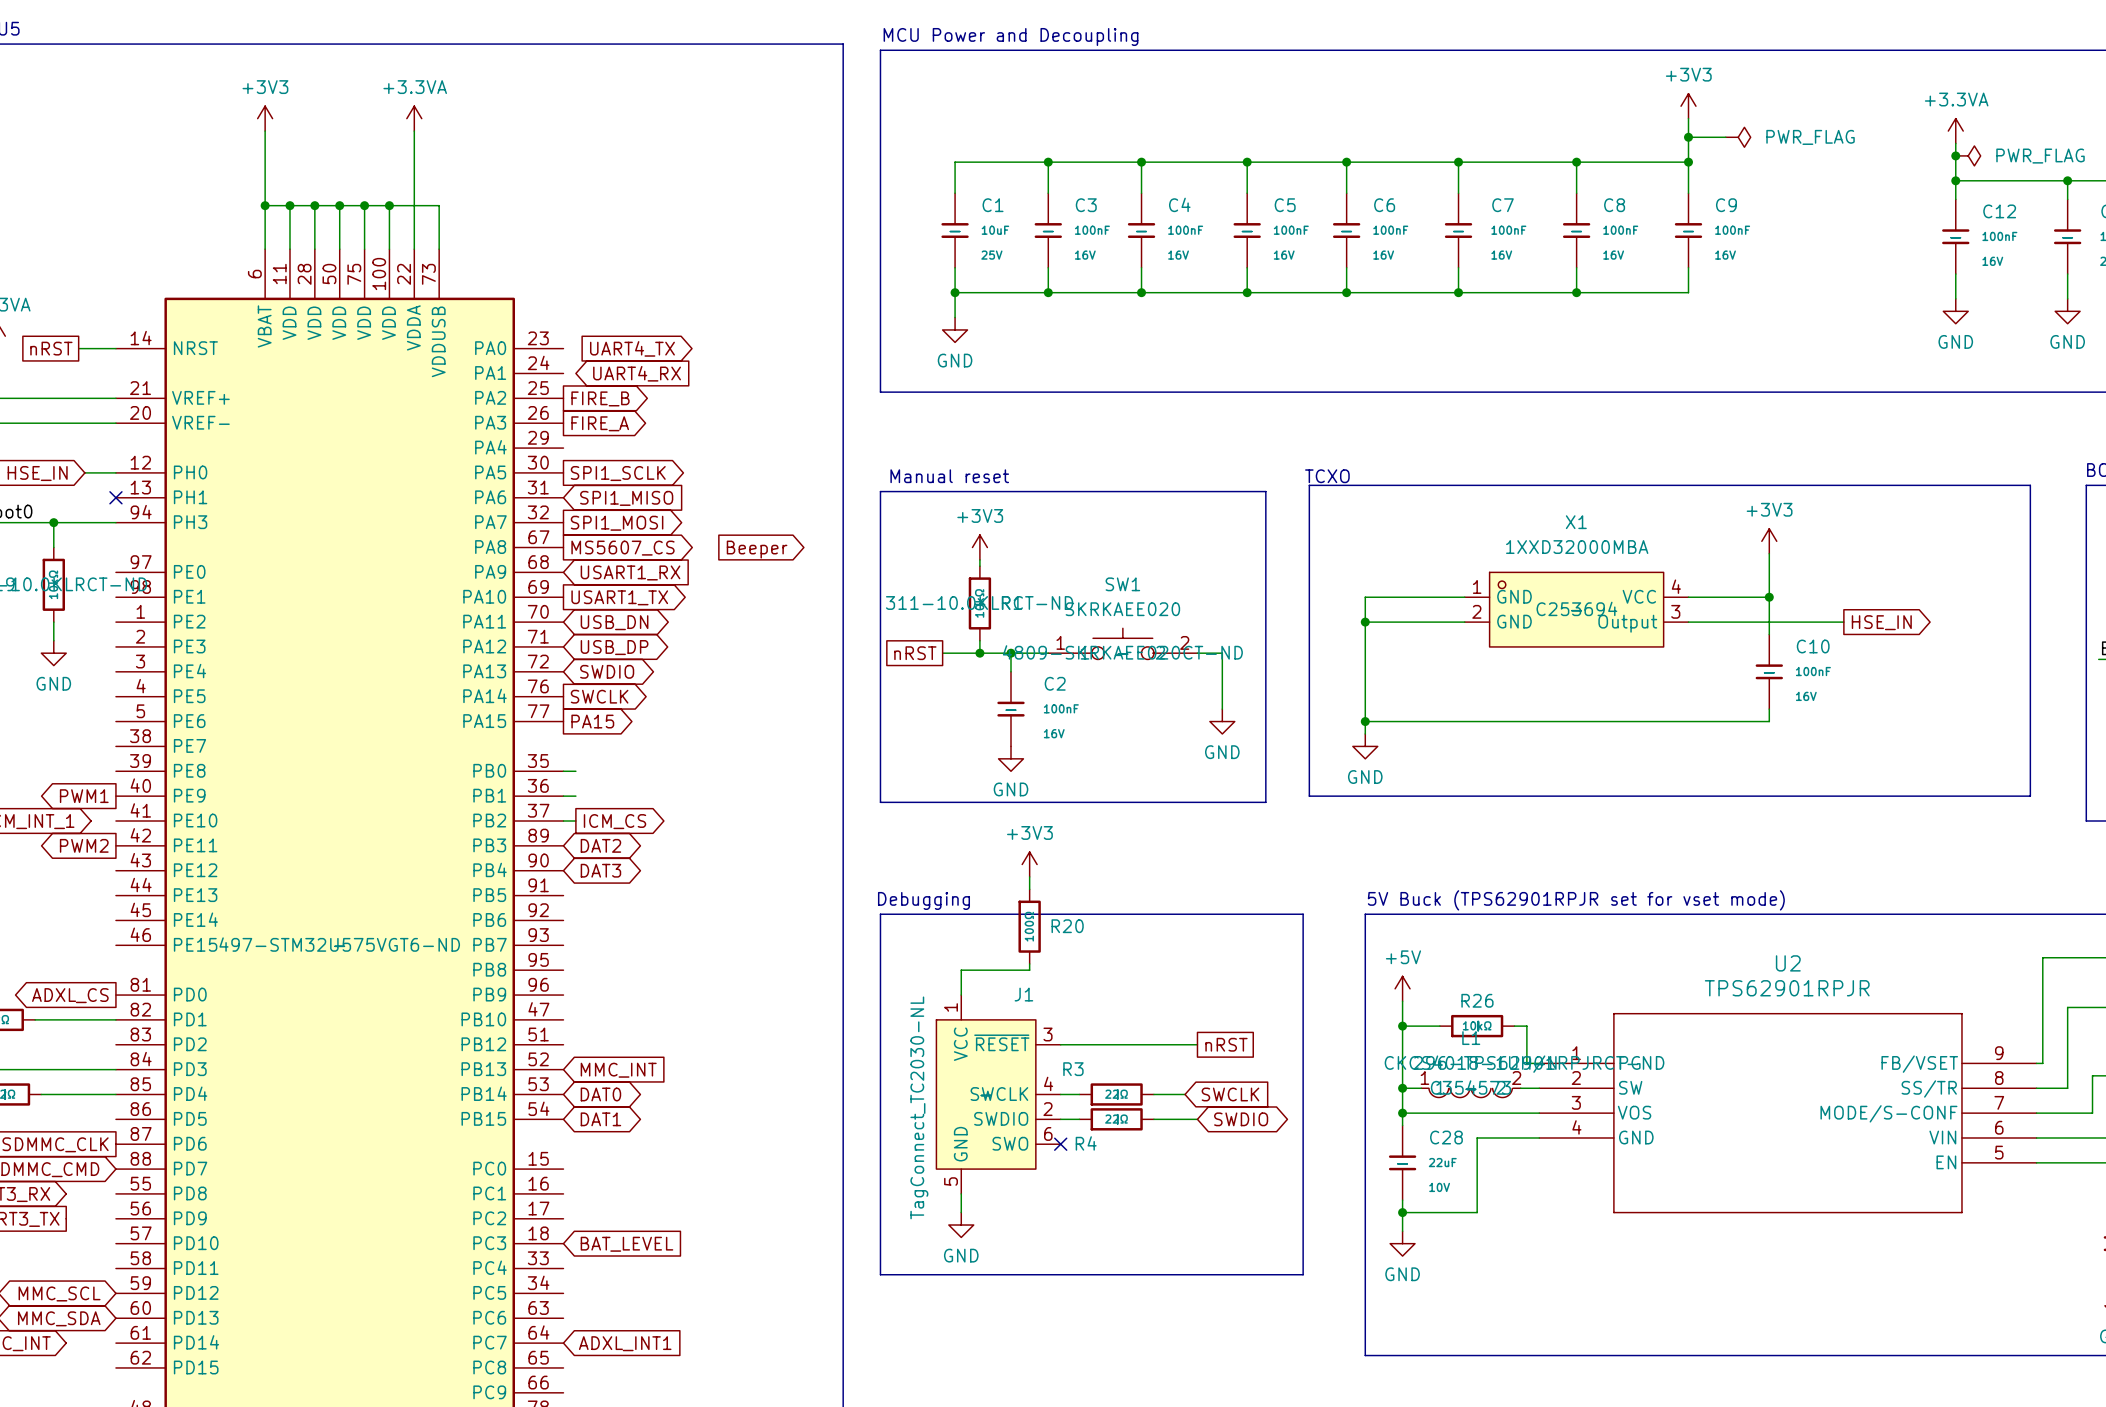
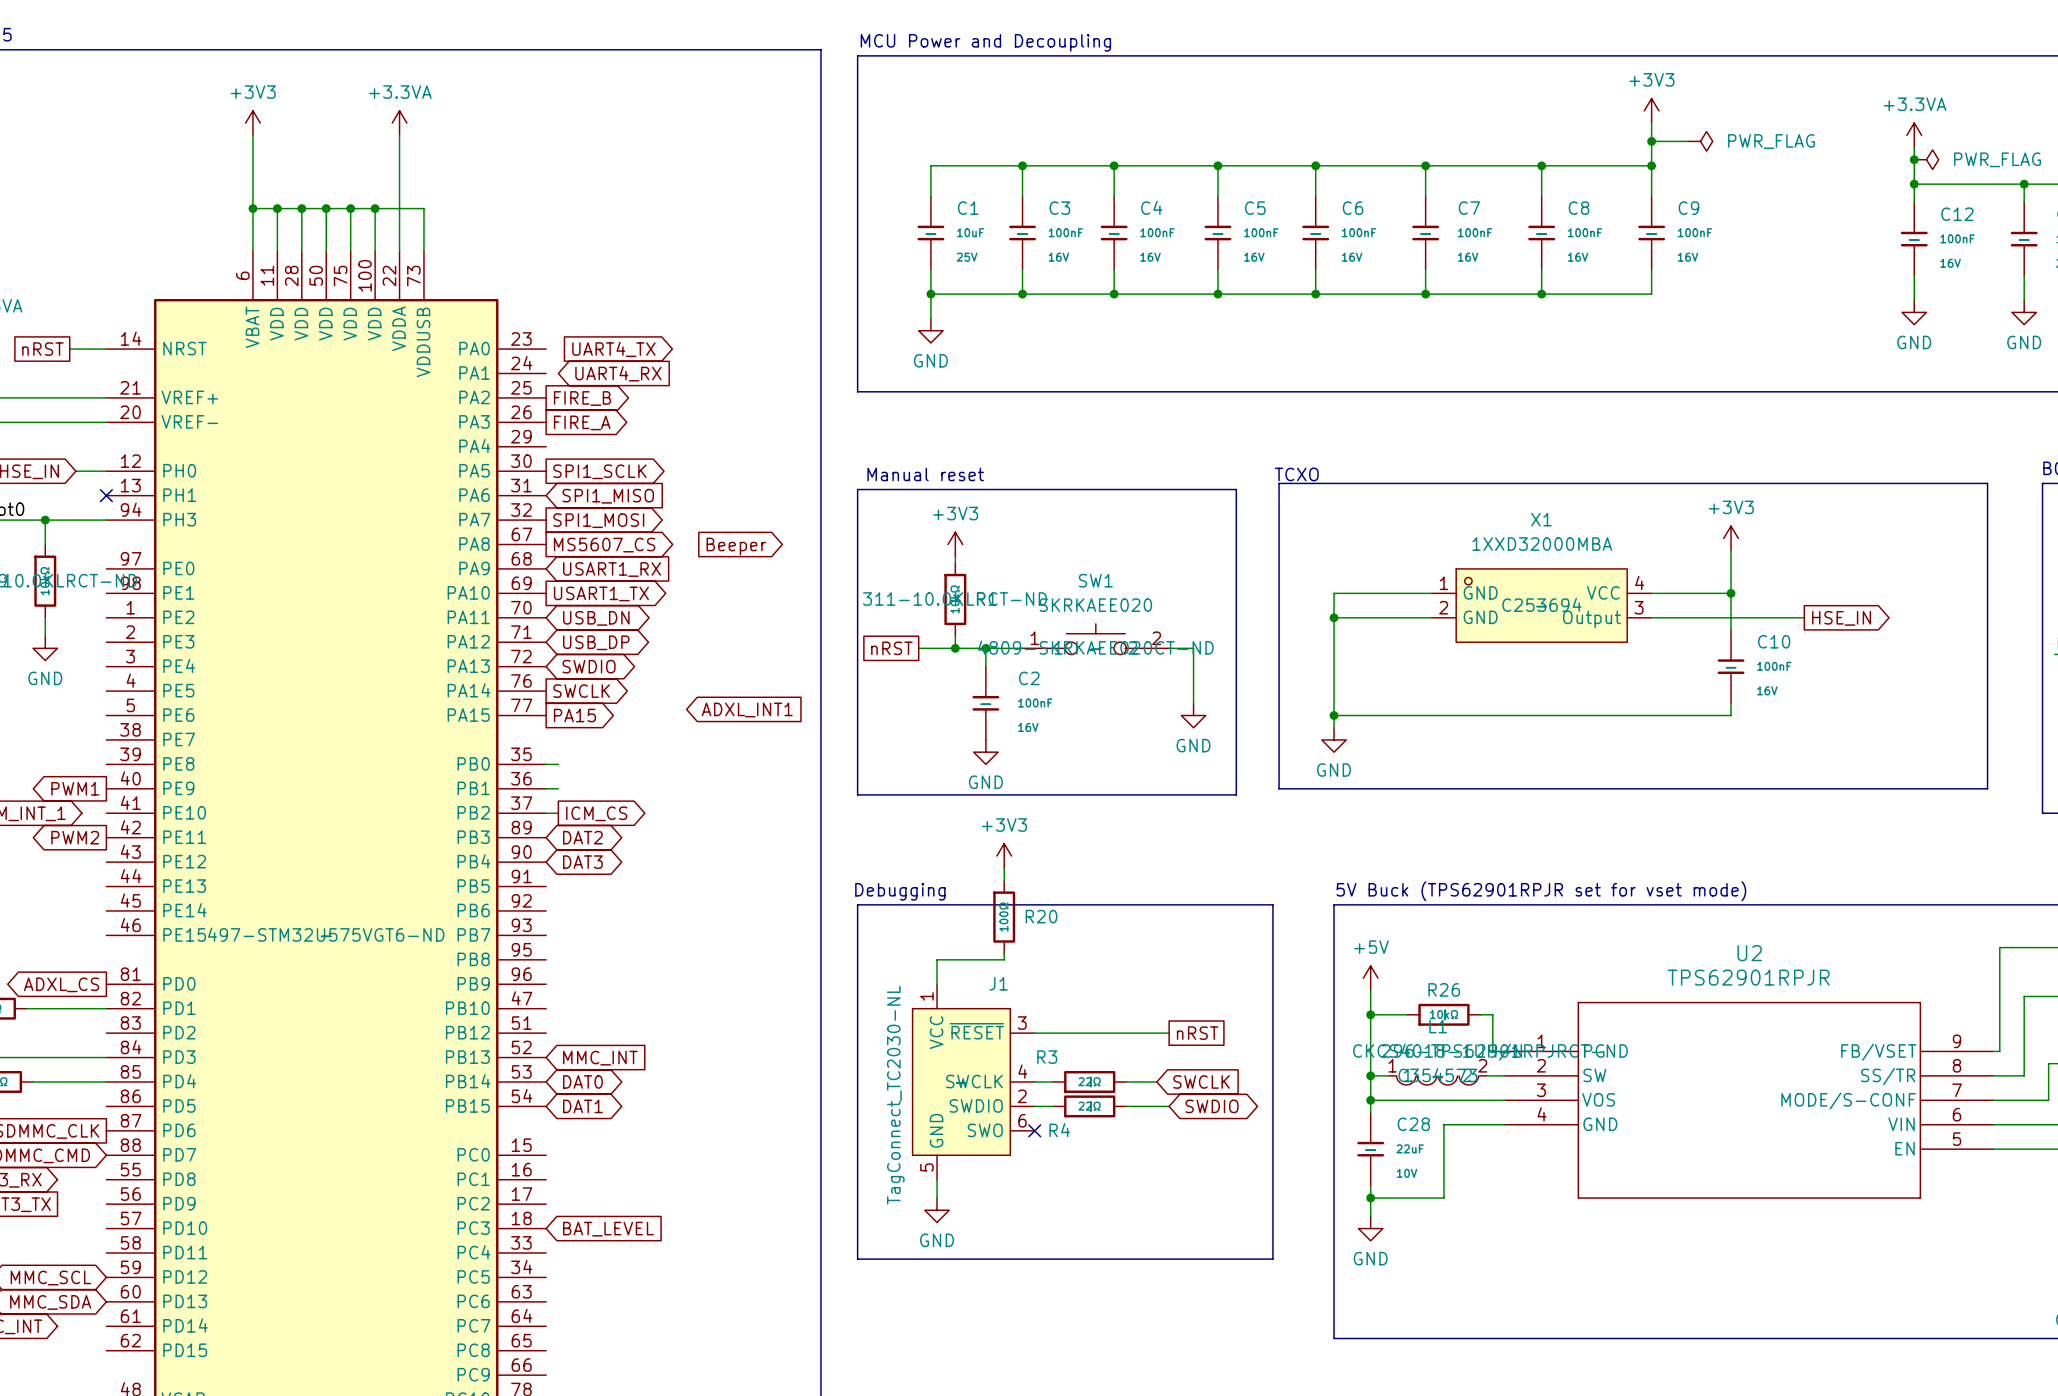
global label: none -> ADXL_INT1 (747, 709)
global label: ADXL_INT1 (625, 1343) -> none

